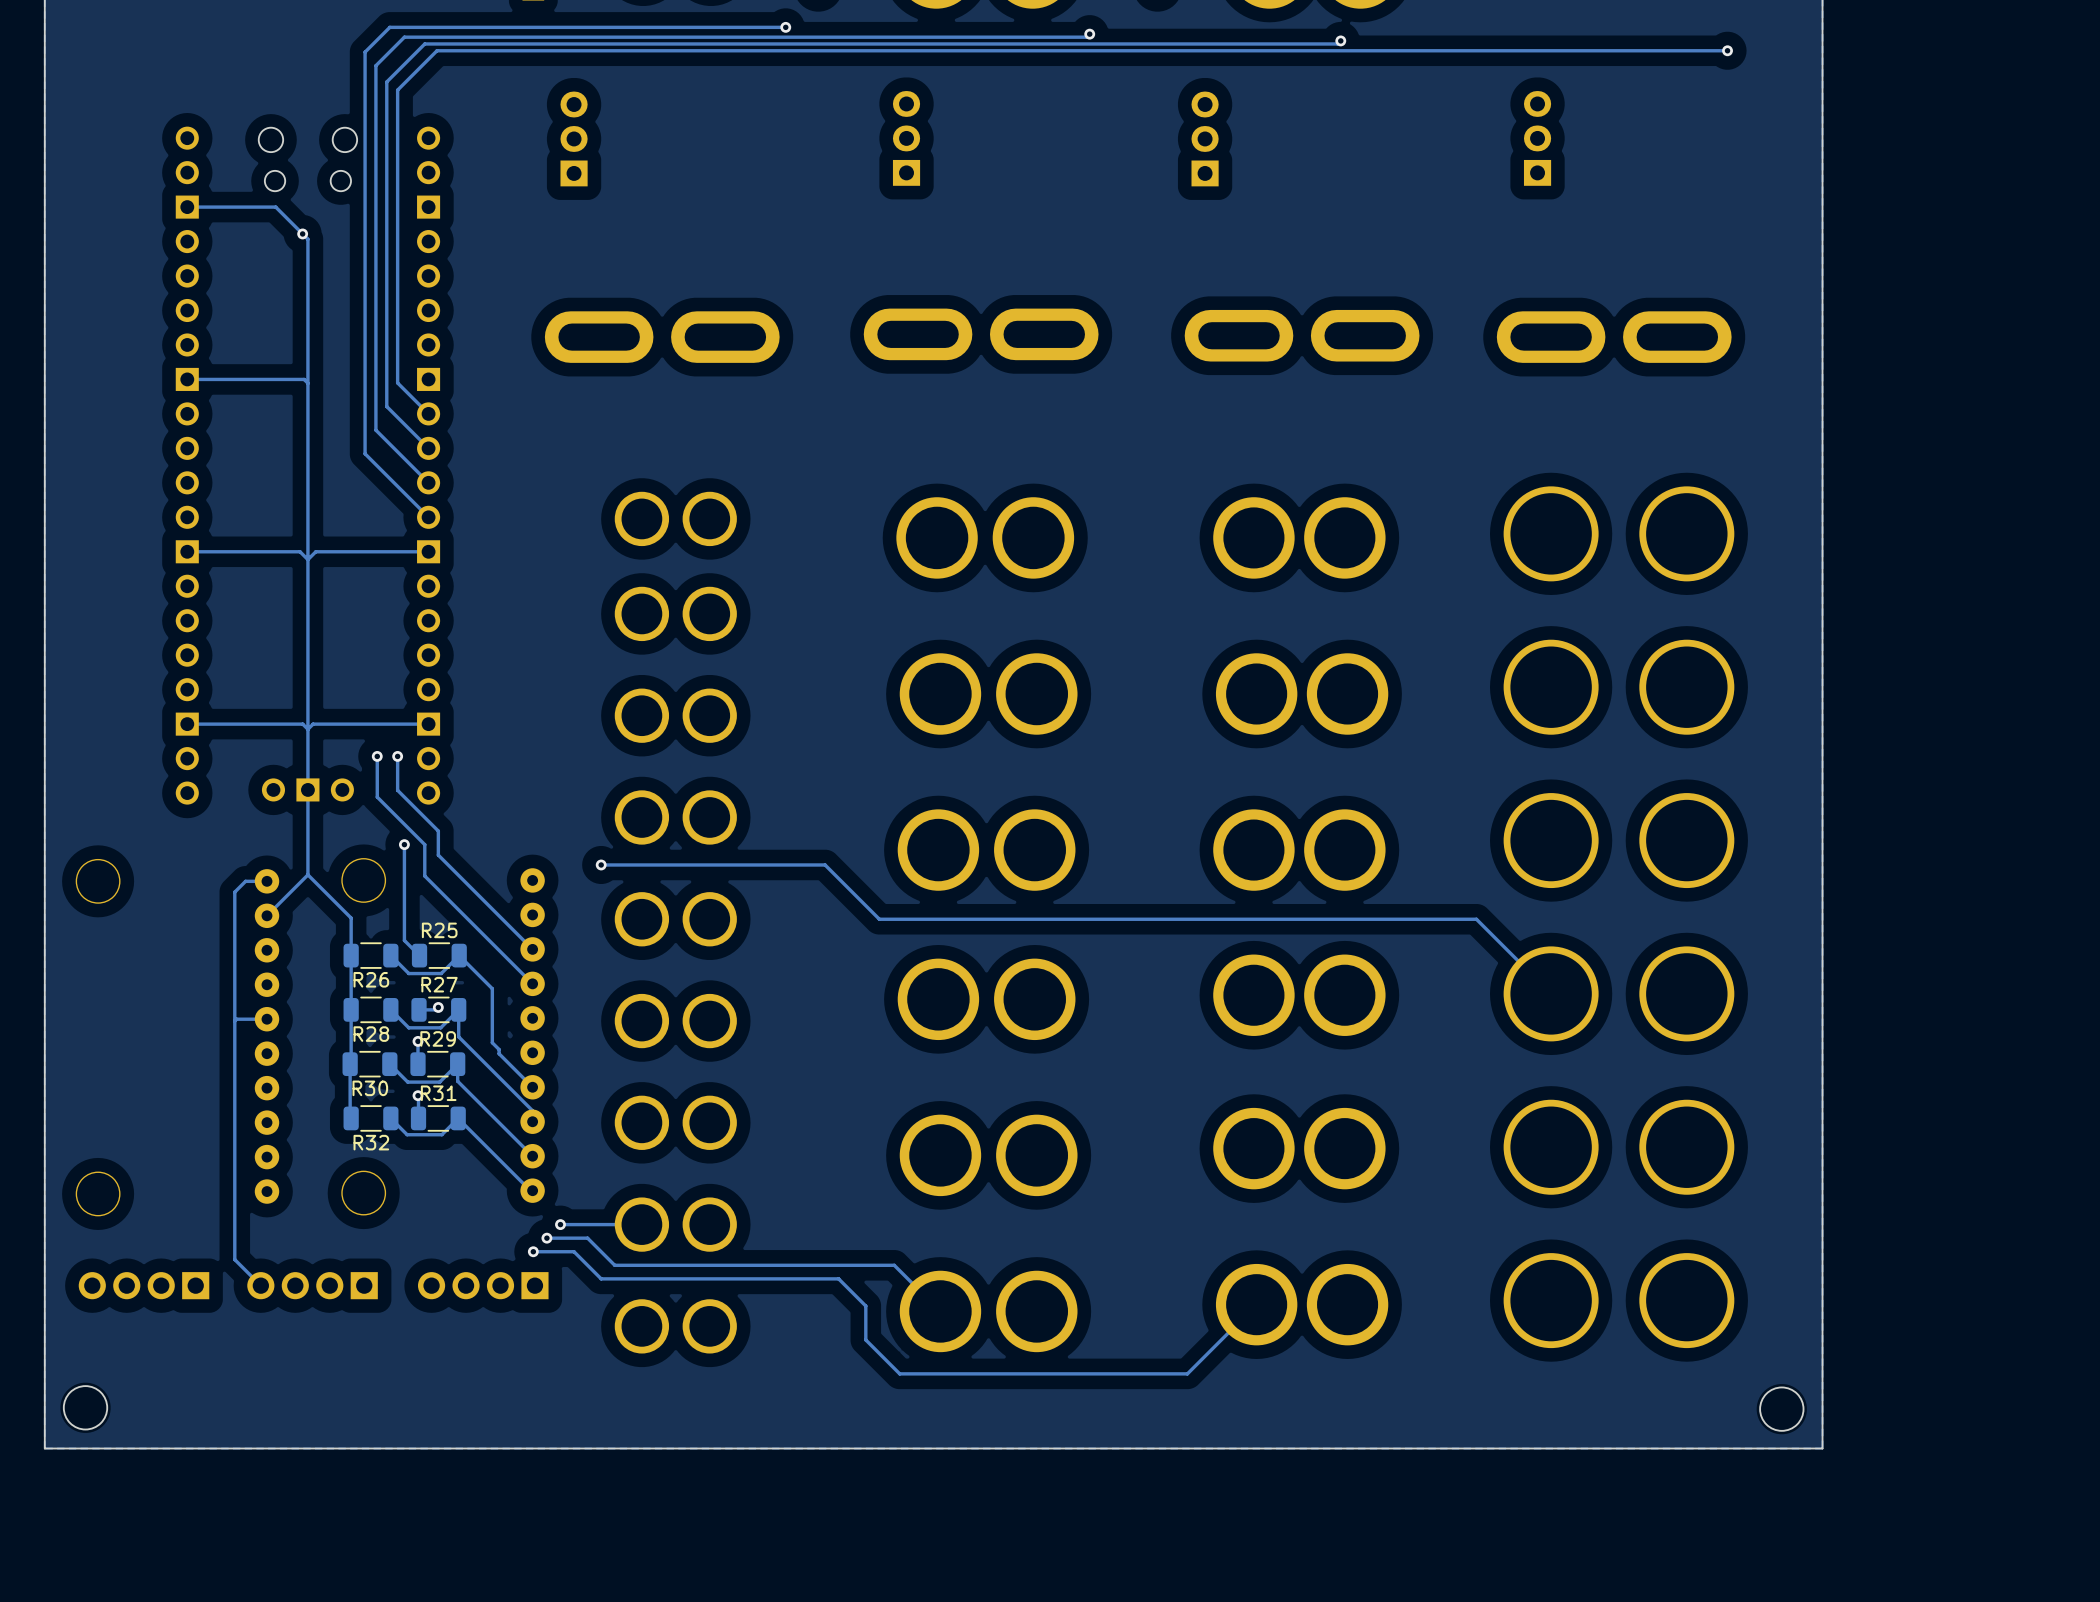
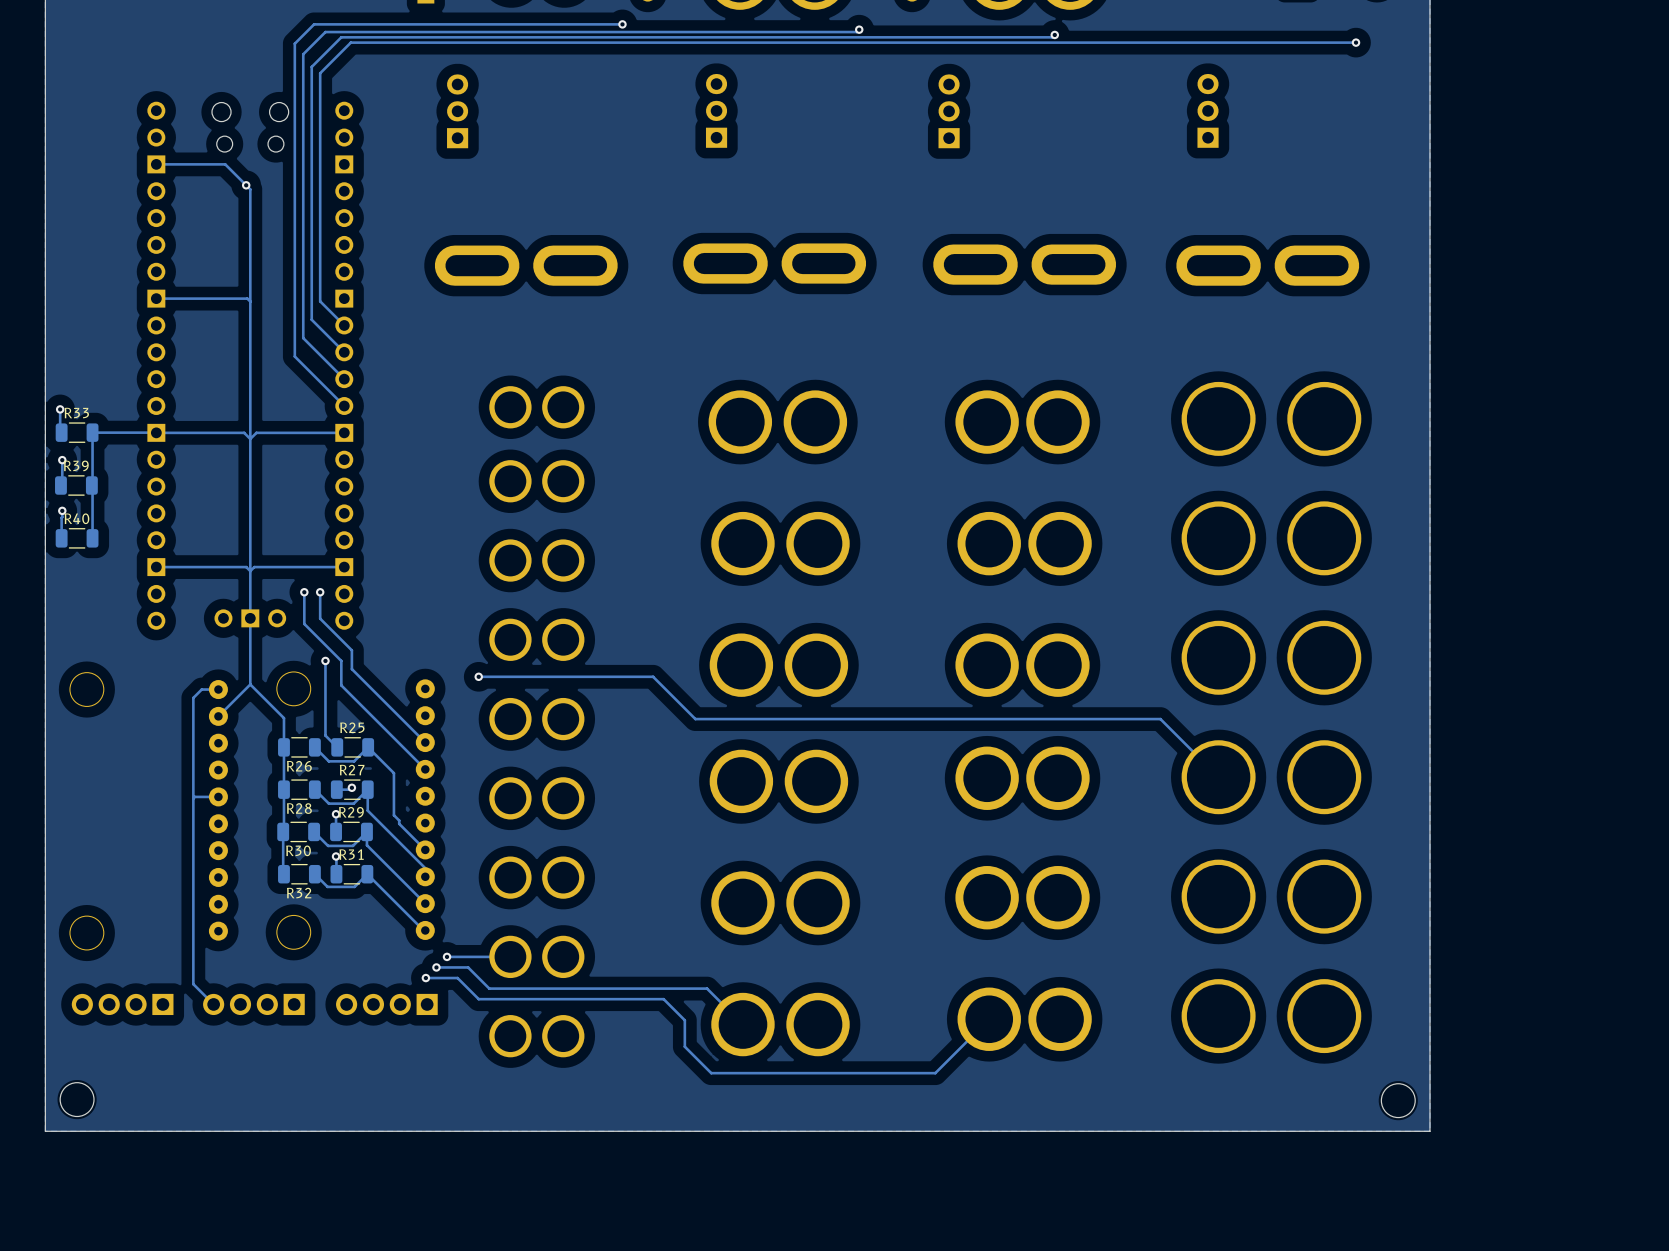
track: none -> (60, 409) (61, 432)
via: none -> (60, 409)
R33: none -> (77, 432)
track: none -> (156, 432) (92, 432) (92, 538)
track: none -> (62, 460) (60, 485)
via: none -> (62, 460)
R39: none -> (76, 485)
track: none -> (62, 510) (61, 538)
via: none -> (62, 510)
R40: none -> (77, 538)

